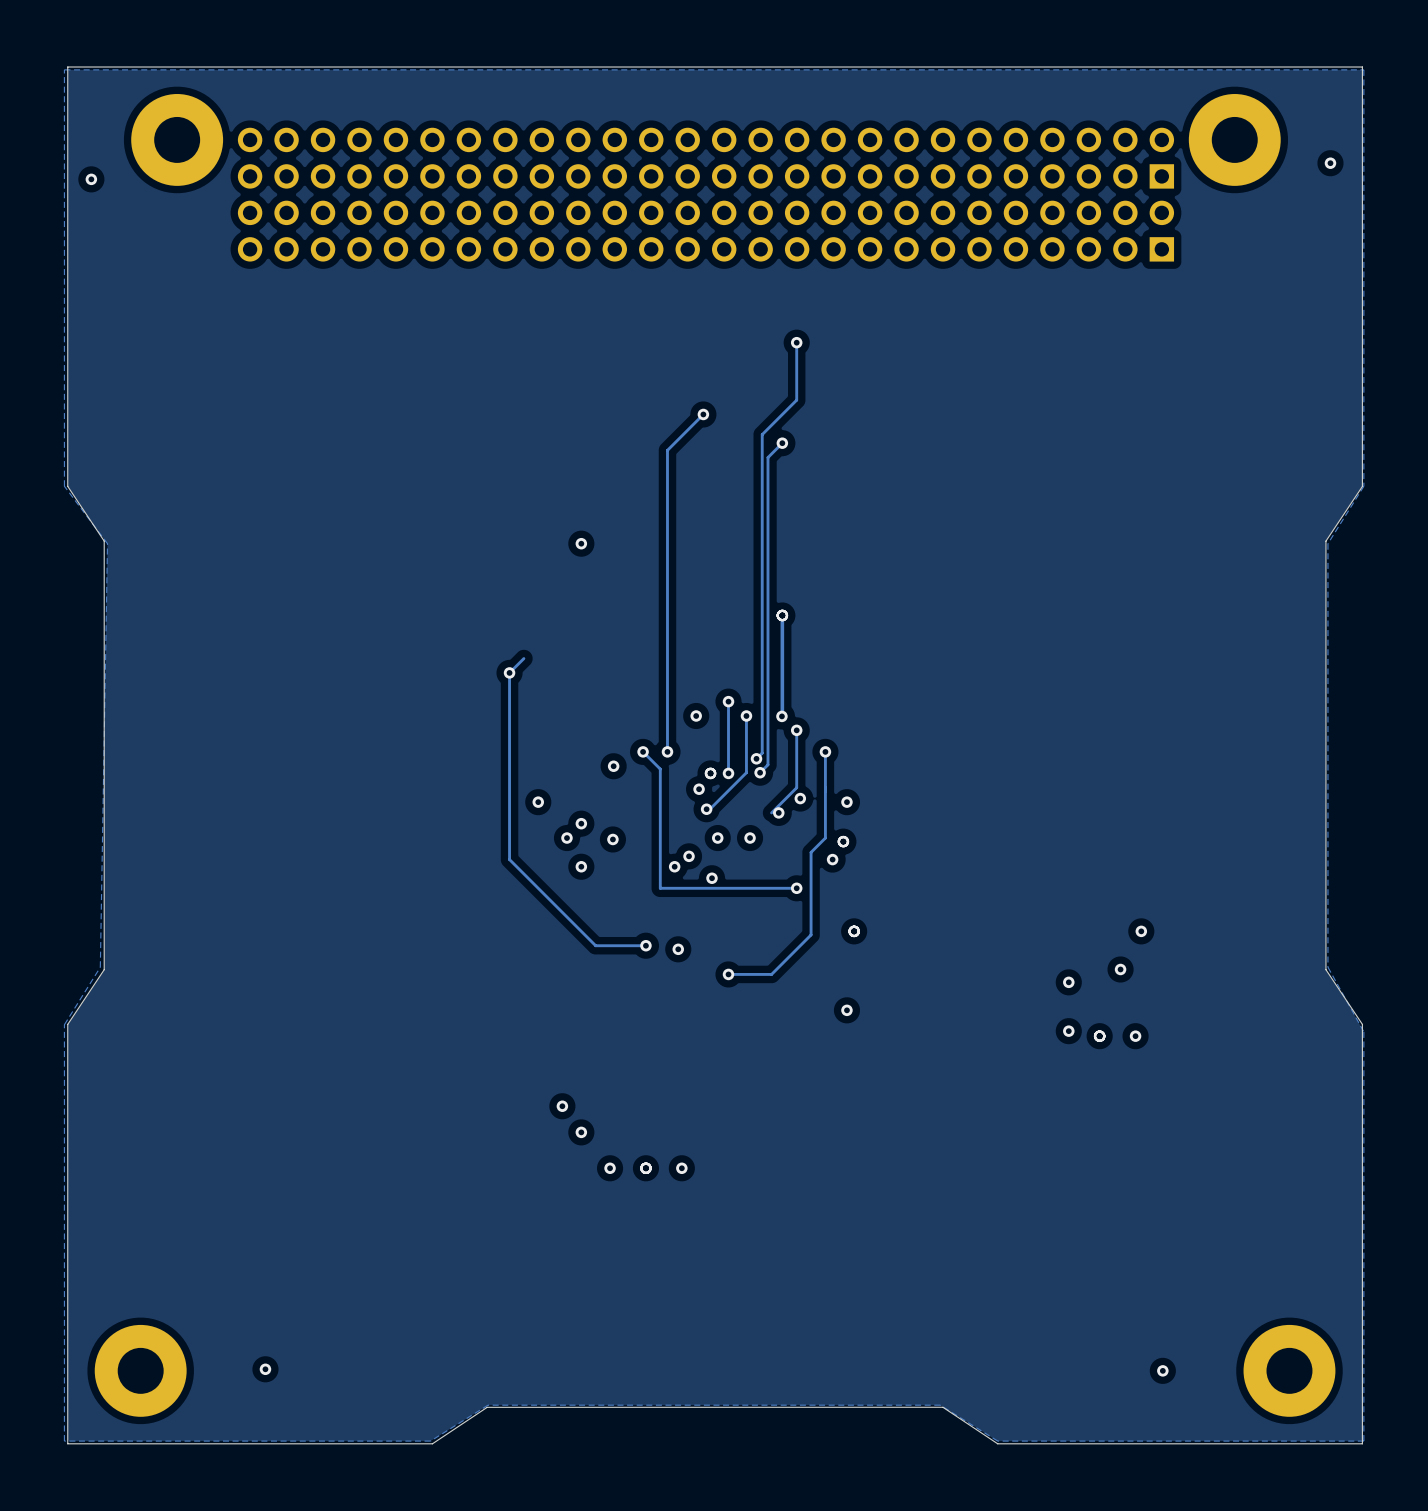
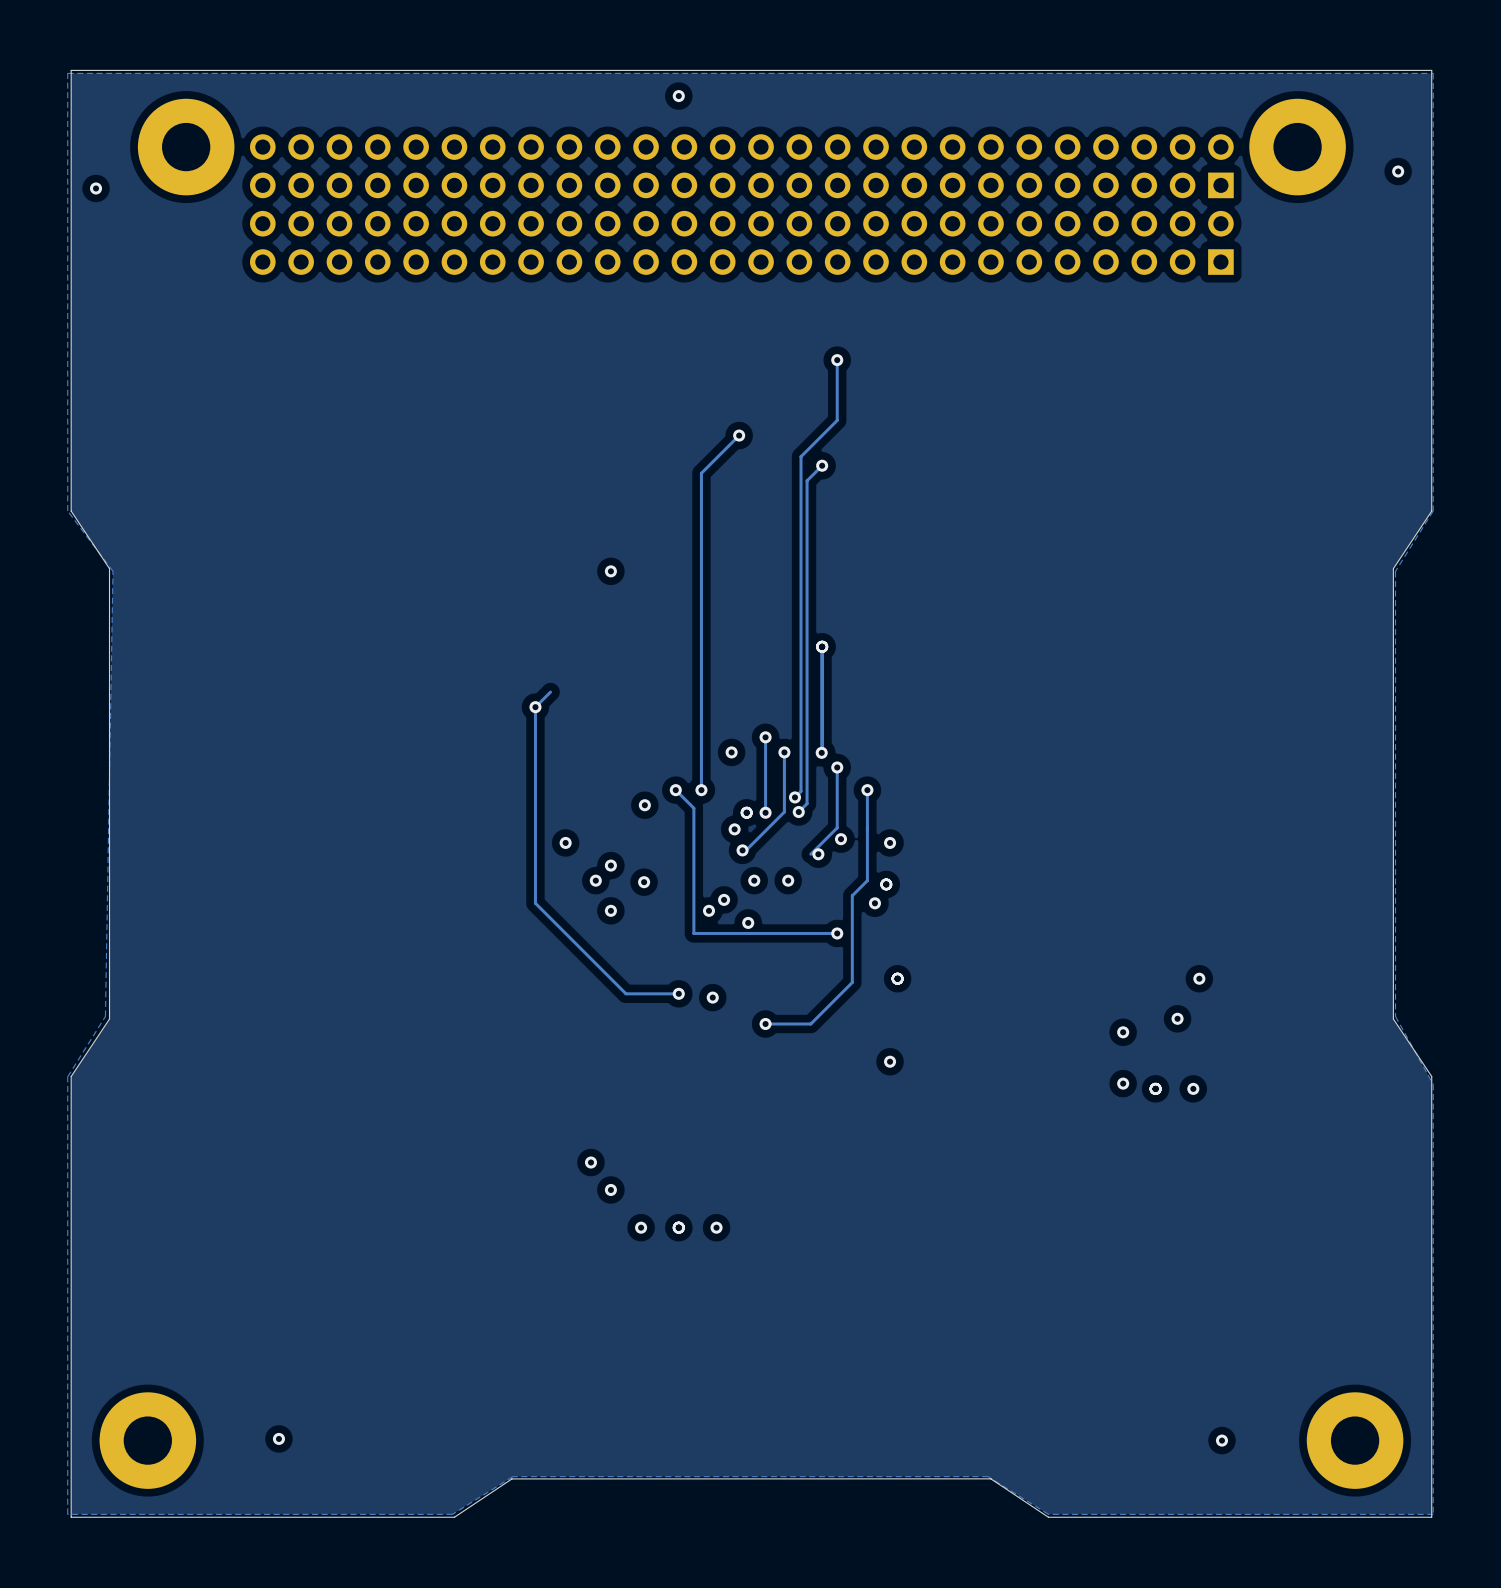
via: none -> (678, 96)

